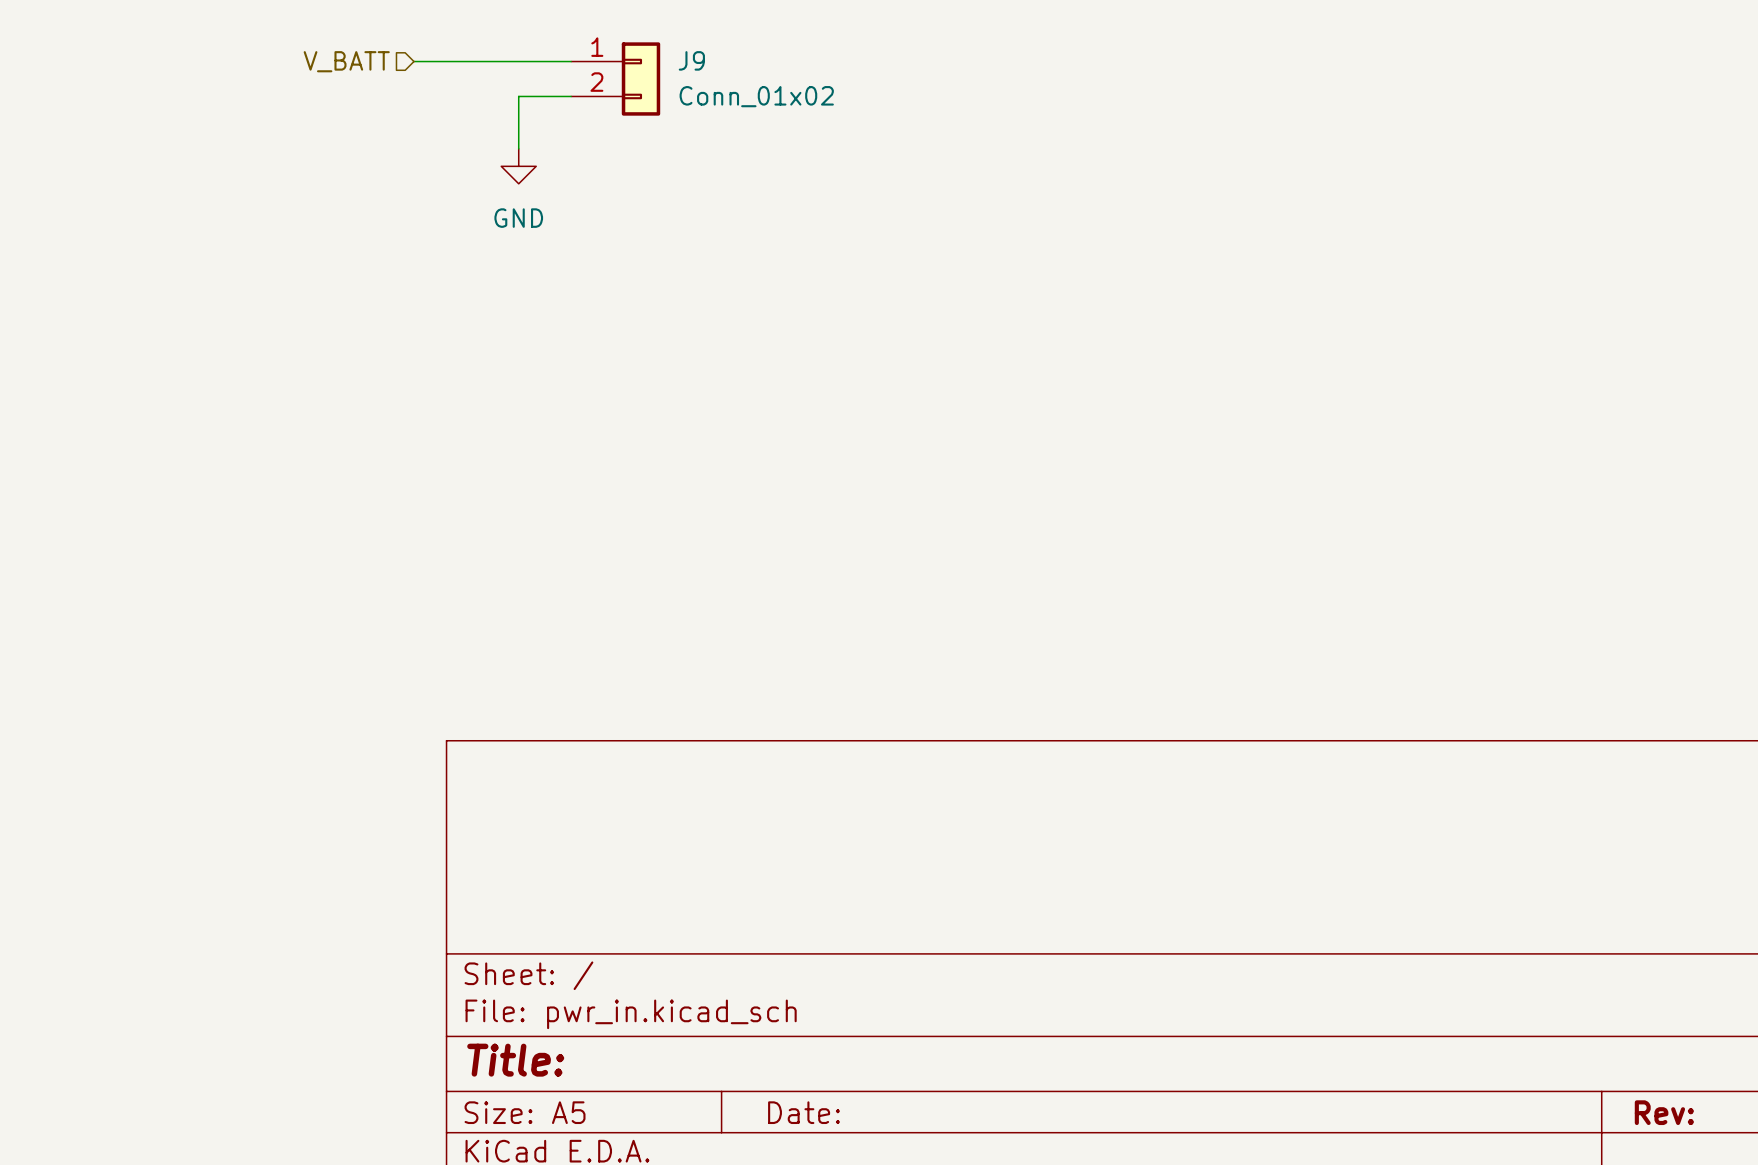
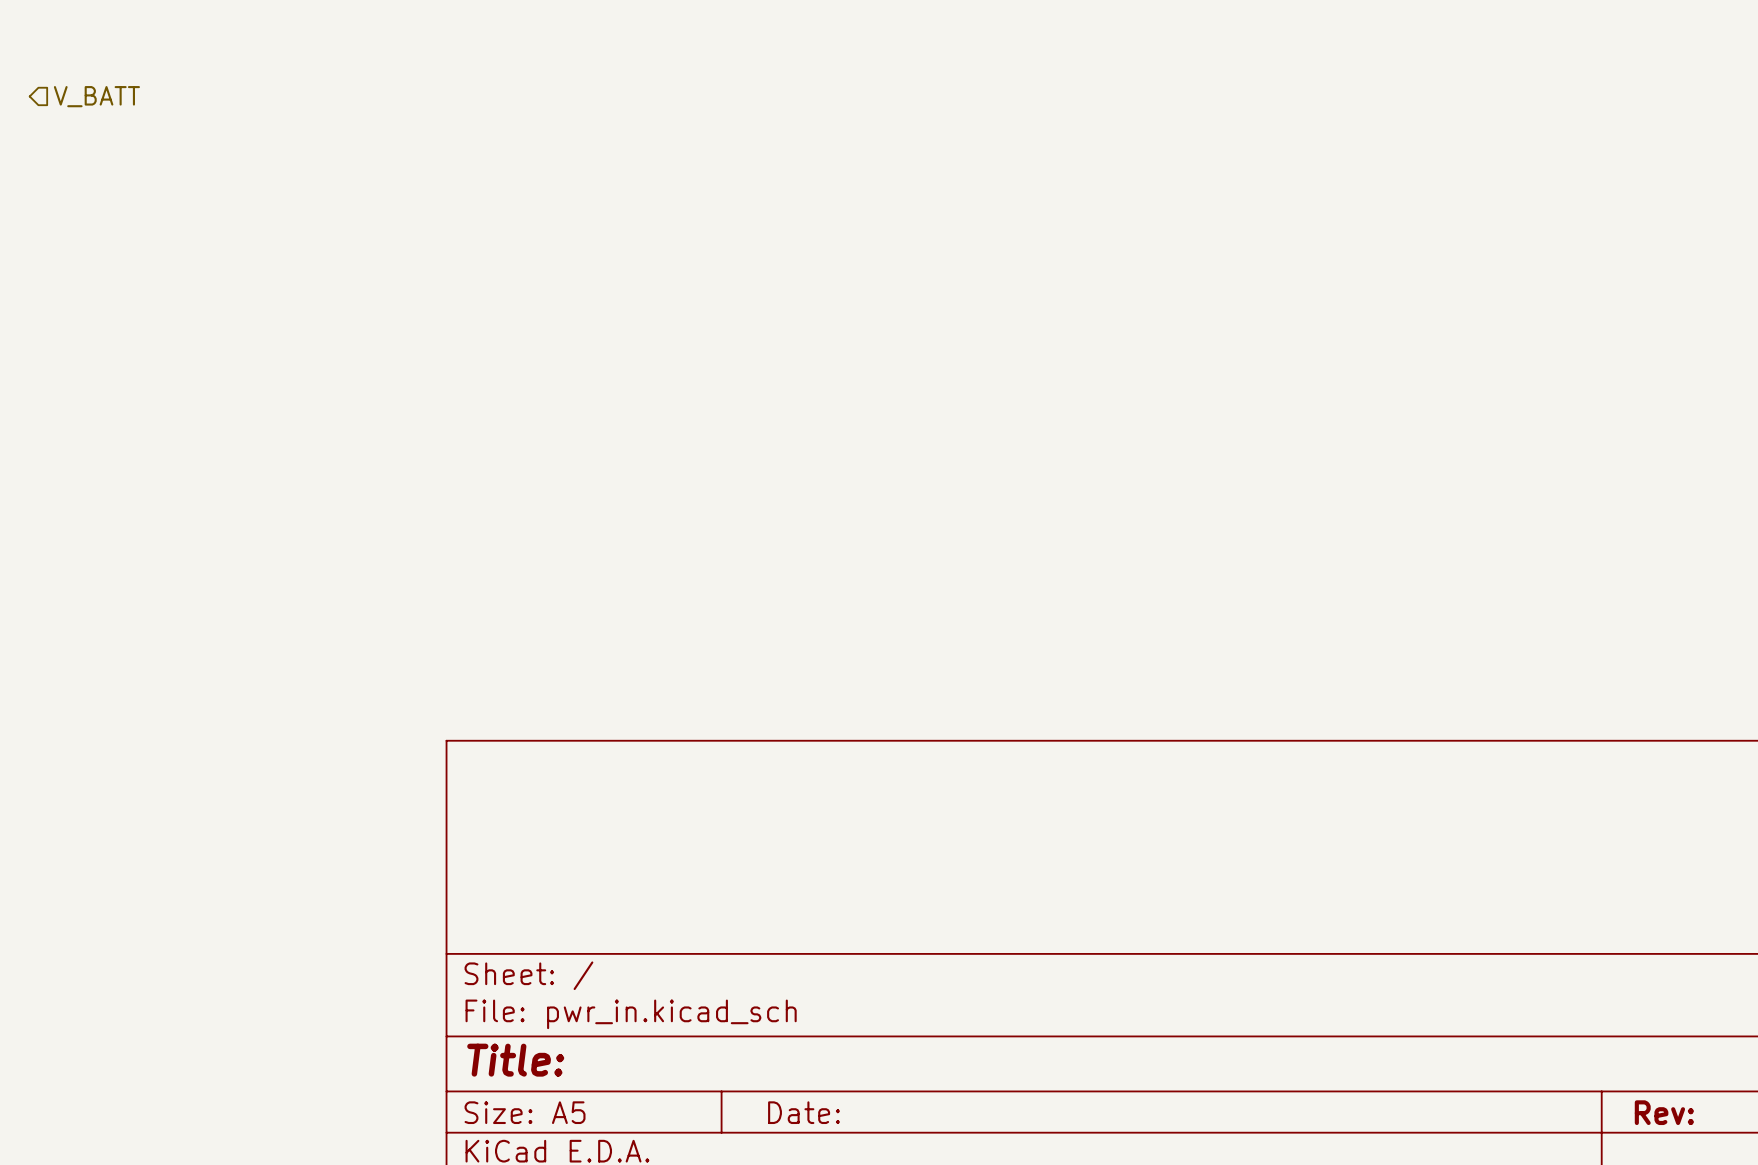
hierarchical label rotation: 0° (346, 61) -> 180° (96, 96)
hierarchical label position: V_BATT (346, 61) -> V_BATT (96, 96)
wire: (413, 61) (571, 61) -> none
J9: Conn_01x02 (615, 79) -> none
wire: (571, 96) (518, 96) (518, 148) -> none
power symbol: GND (518, 166) -> none

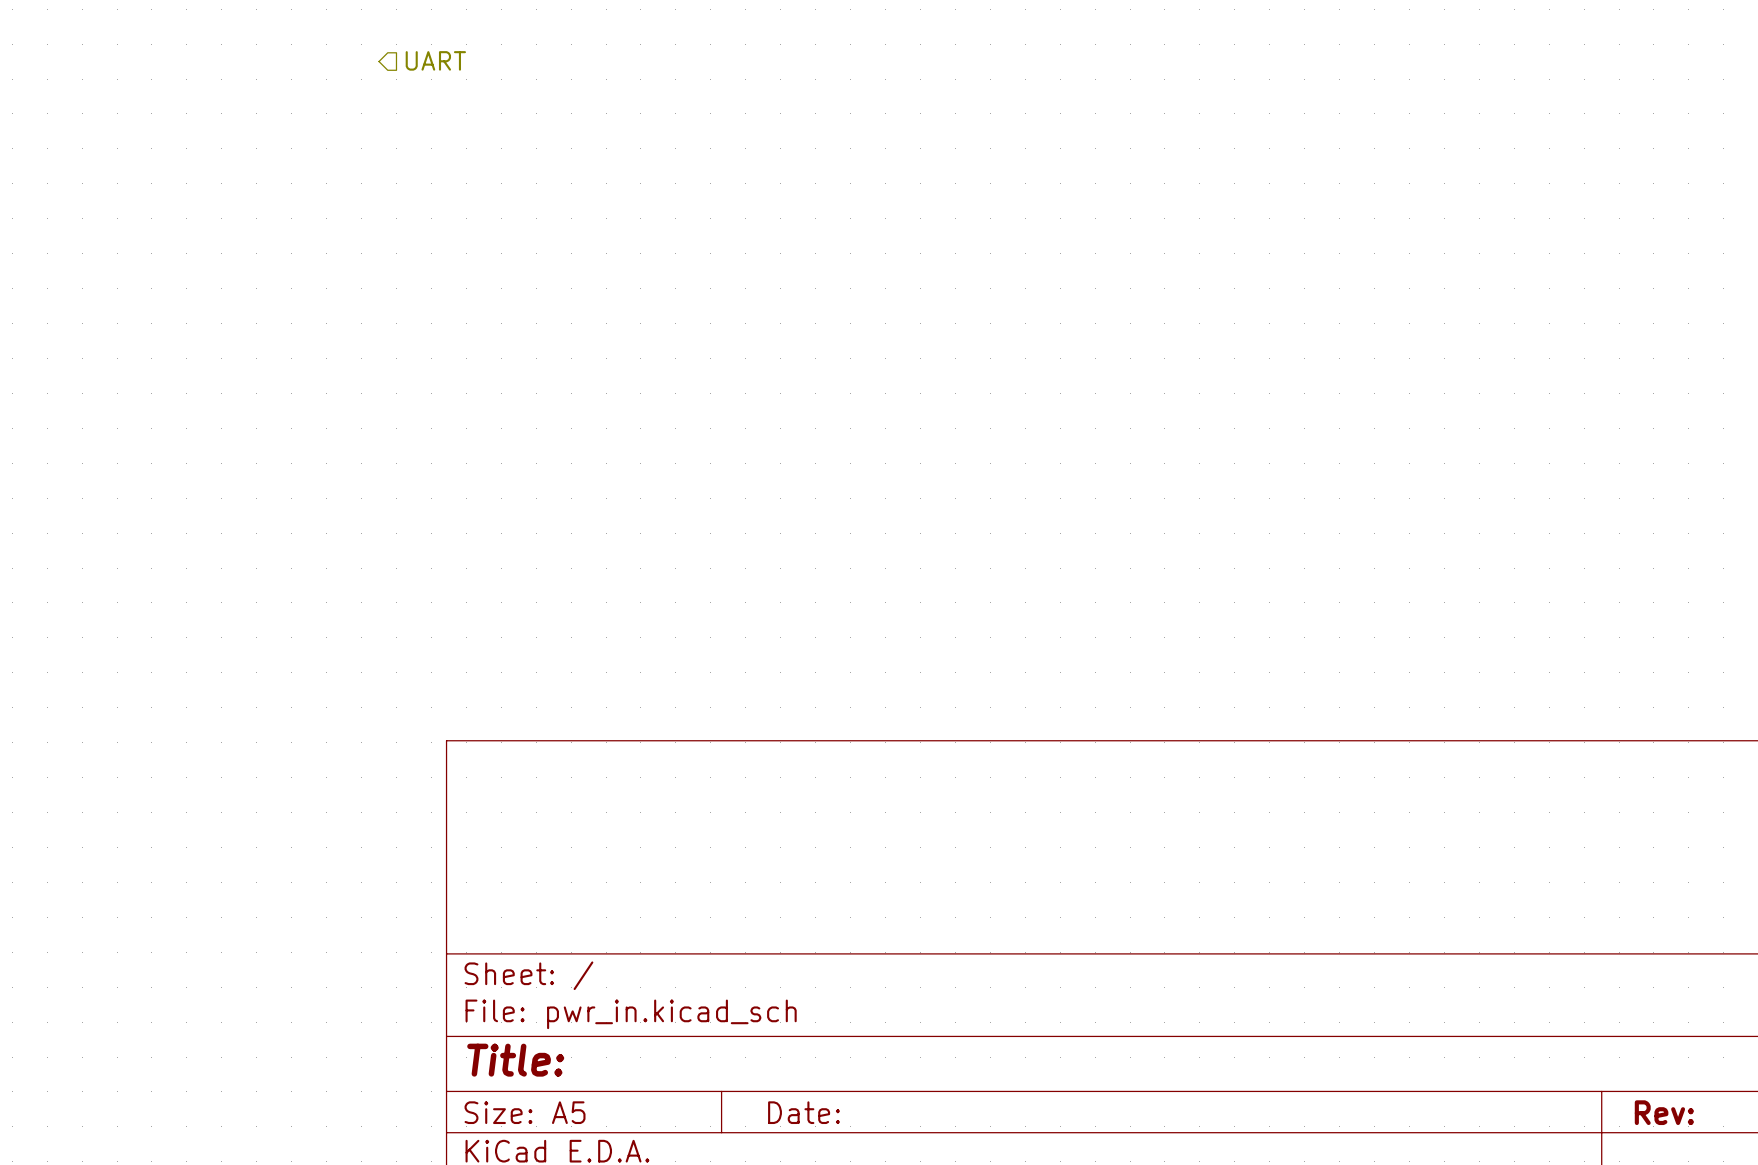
hierarchical label: none -> UART (435, 60)
hierarchical label: V_BATT (96, 96) -> none

